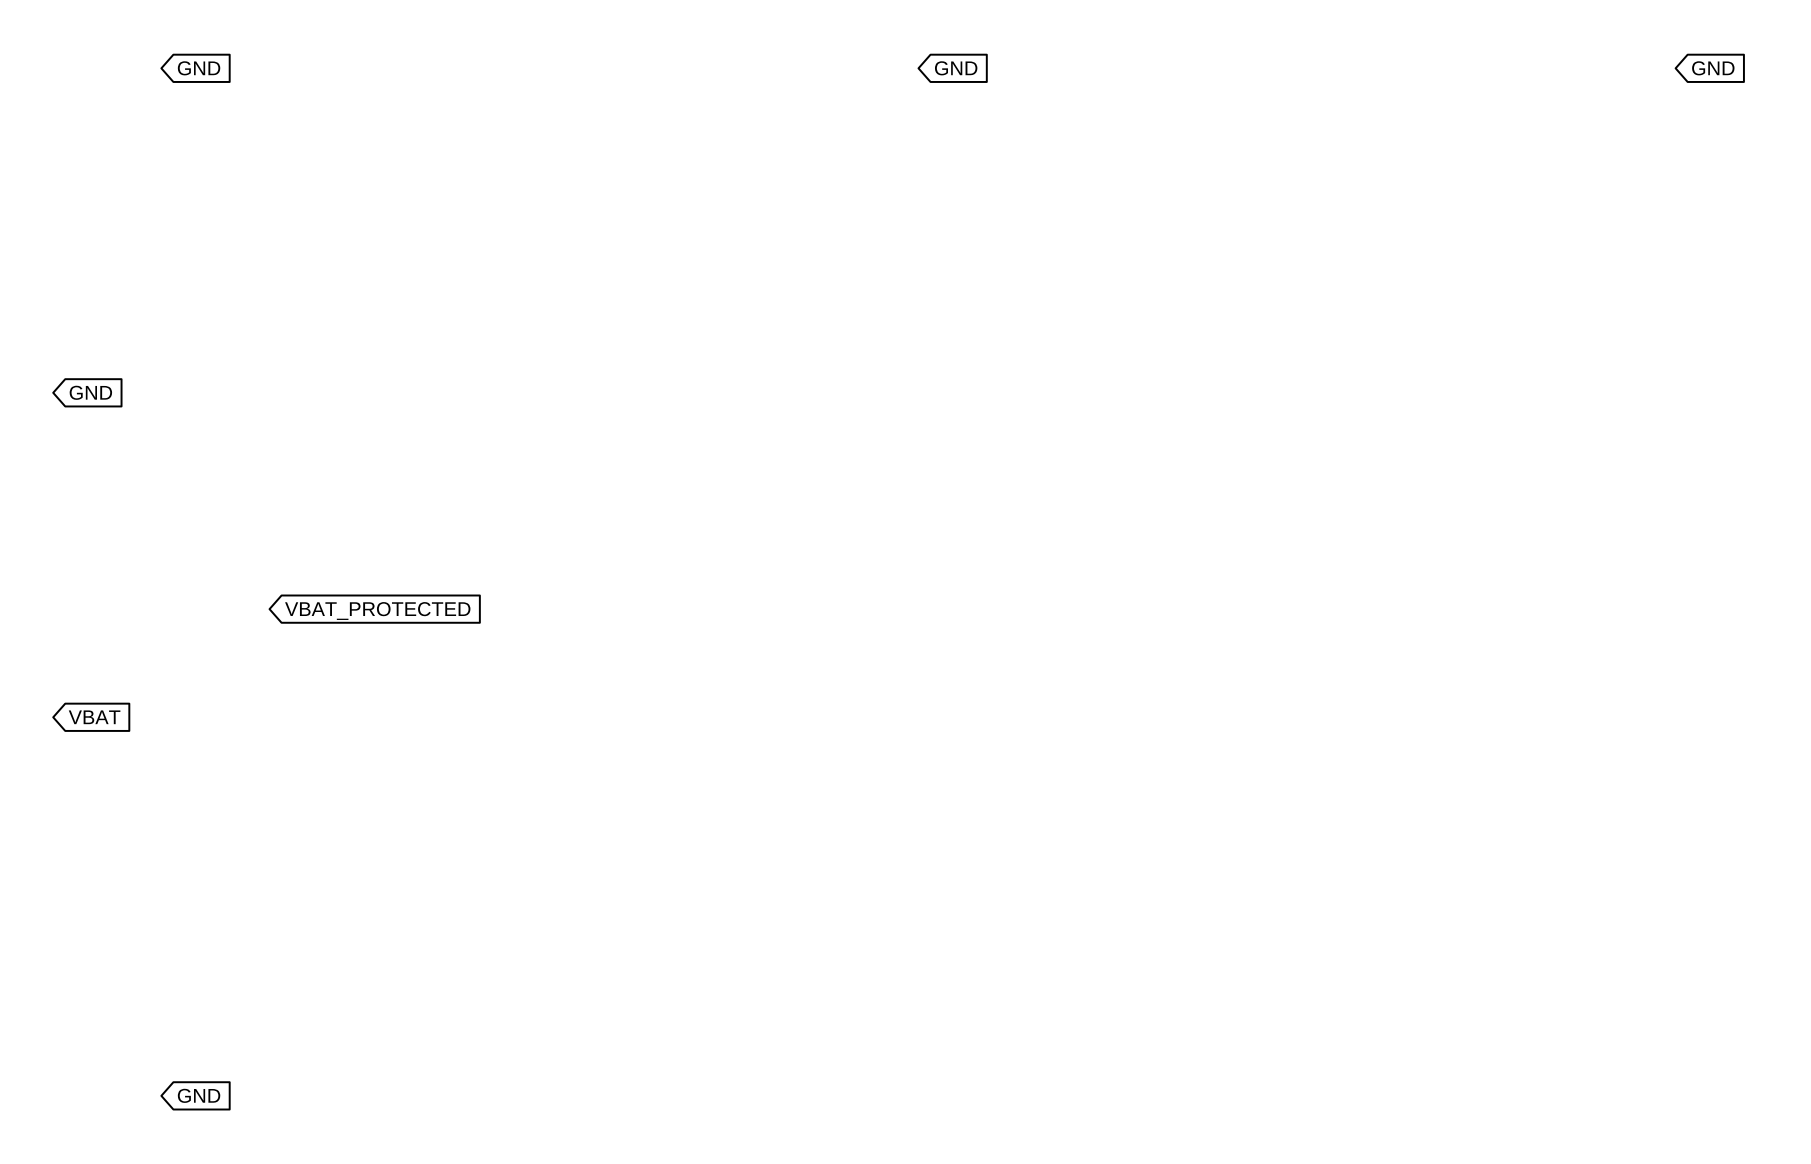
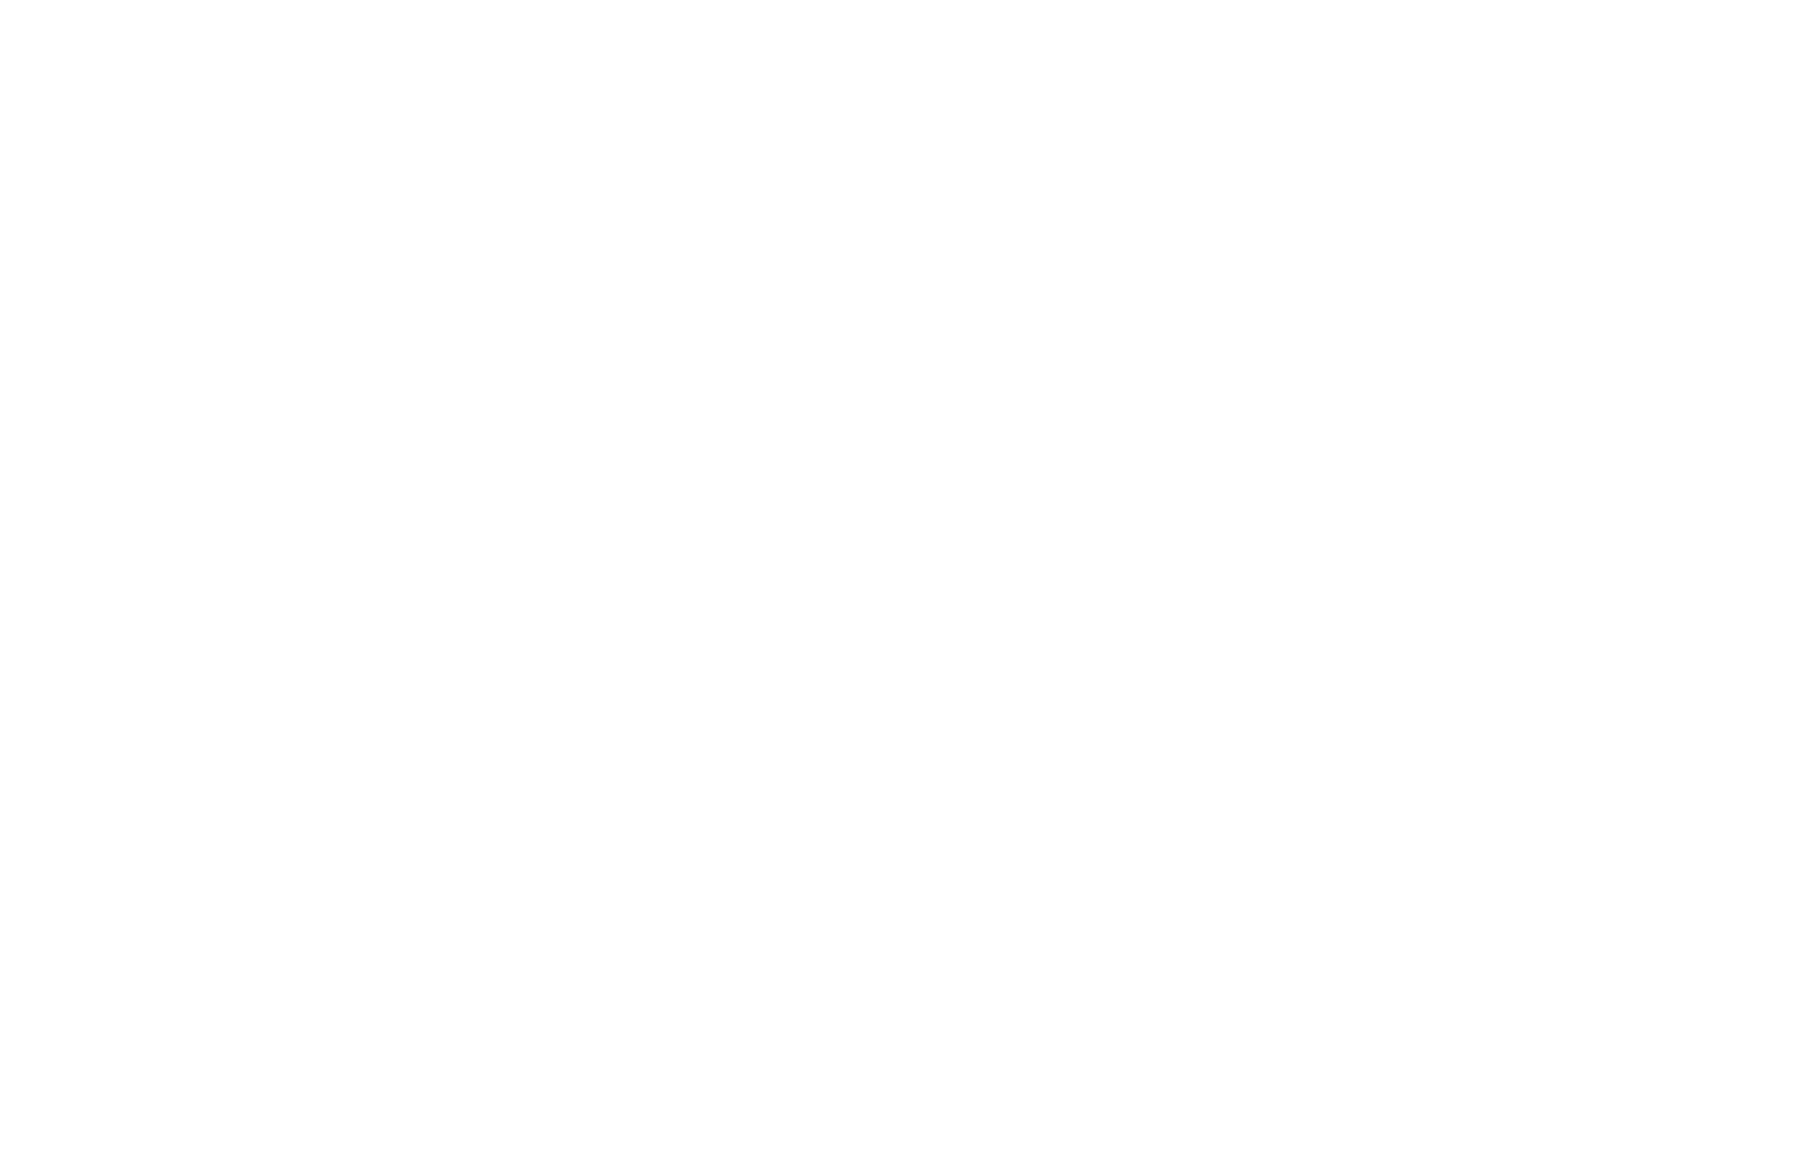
global label: GND (199, 68) -> none
global label: GND (956, 68) -> none
global label: GND (1713, 68) -> none
global label: GND (90, 392) -> none
global label: VBAT_PROTECTED (377, 611) -> none
global label: VBAT (94, 717) -> none
global label: GND (199, 1095) -> none

